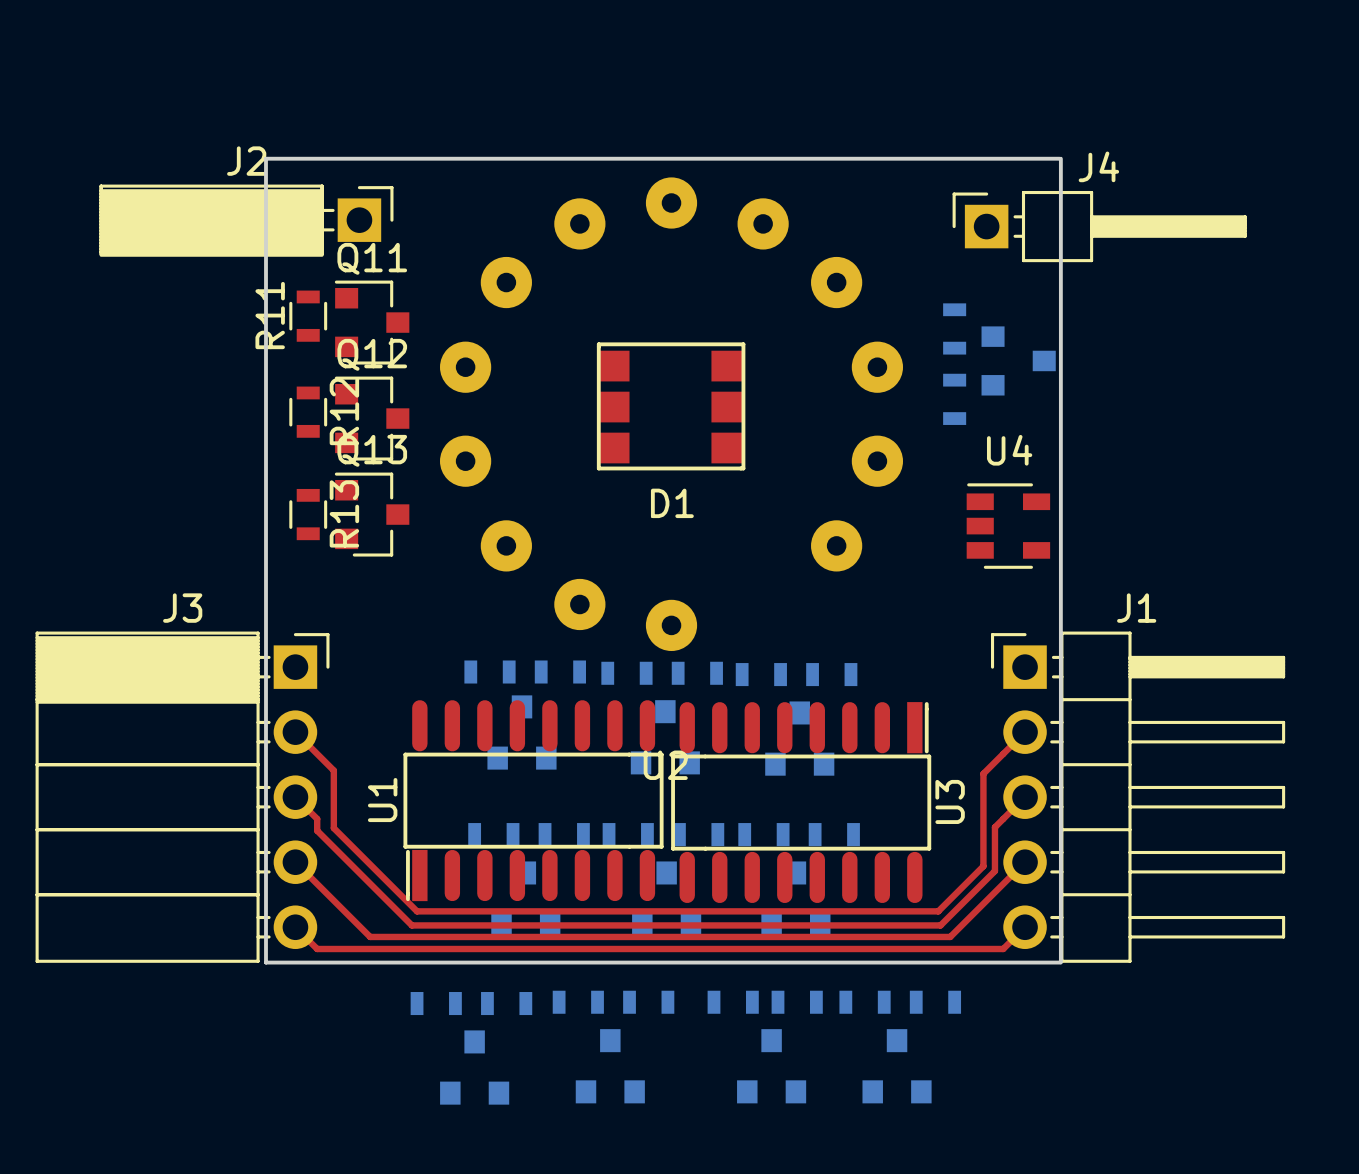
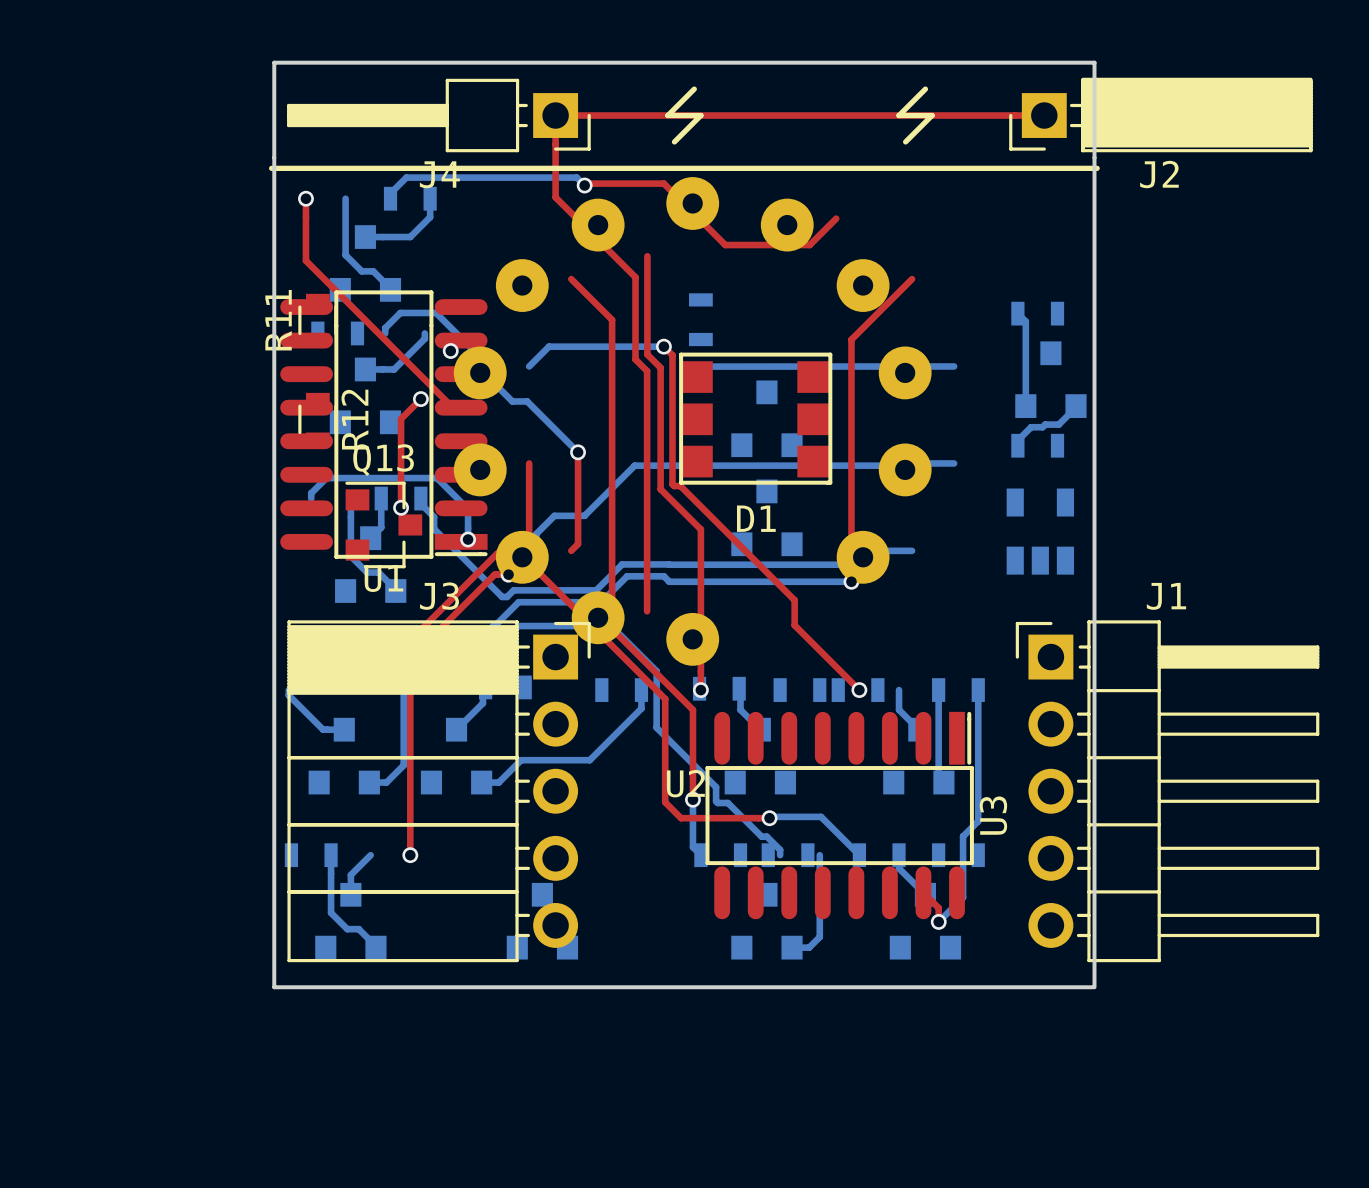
line: none -> (694, 89) (667, 115) (700, 115) (674, 141)
line: none -> (925, 89) (899, 115) (932, 115) (905, 141)
top track: none -> (1044, 115) (555, 115) (555, 197) (635, 277) (635, 359) (647, 371) (647, 611)
board edge: (265, 158) (1059, 158) -> (274, 157) (274, 62) (1094, 62) (1094, 157)
line: none -> (271, 168) (1097, 168)
top track: none -> (584, 185) (586, 183) (663, 183) (725, 245) (809, 245) (836, 218)
bottom track: none -> (584, 185) (576, 177) (406, 177) (390, 193) (390, 198)
via: none -> (584, 185)
top track: none -> (305, 198) (305, 260) (452, 407) (461, 407)
via: none -> (305, 198)
bottom track: none -> (345, 198) (345, 255) (361, 271) (373, 271) (390, 289)
part: none -> (410, 198)
bottom track: none -> (430, 198) (430, 217) (410, 237) (365, 237)
J2 rotation: 0° (246, 220) -> 180° (1160, 114)
J2 position: (246, 220) -> (1160, 114)
J4 rotation: 0° (1099, 226) -> 180° (438, 115)
J4 position: (1099, 226) -> (438, 115)
top track: none -> (647, 256) (647, 354) (660, 367) (660, 489) (700, 529) (700, 690)
part: none -> (365, 263)
top track: none -> (571, 279) (612, 319) (612, 629) (692, 709) (692, 799)
top track: none -> (912, 279) (851, 339) (851, 581)
bottom track: none -> (1017, 313) (1025, 321) (1025, 406)
part: none -> (1037, 313)
Q11 side: top (372, 322) -> bottom (766, 517)
part: none -> (337, 333)
bottom track: none -> (385, 333) (385, 328) (400, 312) (436, 312) (494, 371) (494, 383) (512, 401) (527, 401) (578, 452)
bottom track: none -> (424, 333) (424, 338) (394, 369) (365, 369)
part: (954, 328) -> none
top track: none -> (663, 346) (672, 355) (672, 484) (680, 486) (794, 600) (794, 625) (859, 690)
bottom track: none -> (663, 346) (549, 346) (529, 366)
via: none -> (663, 346)
via: none -> (450, 351)
part rotation: 0° (1018, 360) -> 90° counterclockwise (1050, 379)
bottom track: none -> (702, 366) (954, 366)
part: none -> (365, 395)
top track: none -> (420, 399) (401, 418) (401, 507)
via: none -> (420, 399)
part: (954, 399) -> none
bottom track: none -> (1076, 406) (1058, 424) (1031, 427) (1017, 440) (1017, 445)
D1 position: (671, 406) -> (755, 418)
Q12 side: top (372, 418) -> bottom (766, 418)
part: none -> (1037, 445)
top track: none -> (578, 452) (578, 544) (571, 550)
via: none -> (578, 452)
top track: none -> (529, 463) (529, 562) (665, 698) (665, 802) (681, 818) (769, 818)
bottom track: none -> (954, 463) (916, 463) (914, 465) (634, 465) (584, 515) (554, 515) (536, 534) (536, 558) (519, 574) (508, 574)
bottom track: none -> (311, 498) (311, 493) (326, 478) (436, 478) (468, 509) (468, 539)
bottom track: none -> (350, 498) (350, 556) (367, 572) (378, 572) (395, 591)
bottom track: none -> (381, 498) (381, 527) (370, 538)
part: none -> (401, 498)
bottom track: none -> (420, 498) (420, 503) (434, 517) (434, 528) (502, 596) (507, 596) (513, 590) (596, 590) (622, 564) (668, 564)
via: none -> (401, 507)
R13 side: top (308, 514) -> bottom (700, 319)
U4 side: top (1008, 526) -> bottom (1040, 531)
via: none -> (468, 539)
bottom track: none -> (912, 550) (874, 550) (860, 564) (669, 564)
top track: none -> (508, 553) (497, 553) (410, 640) (410, 855)
part: none -> (370, 564)
top track: none -> (508, 574) (494, 574) (432, 636) (432, 663)
via: none -> (508, 574)
bottom track: none -> (851, 581) (669, 581) (663, 576) (627, 576) (601, 602) (518, 602) (456, 663) (456, 671) (443, 684) (443, 690)
via: none -> (851, 581)
bottom track: none -> (501, 642) (517, 626) (611, 626) (656, 671) (656, 727) (716, 787) (716, 801) (727, 803) (761, 836) (766, 836) (780, 849) (780, 855)
part: (560, 672) -> none
part: (626, 673) -> none
bottom track: none -> (288, 690) (288, 695) (323, 729) (344, 729)
bottom track: none -> (403, 690) (403, 765) (386, 782) (369, 782)
bottom track: none -> (482, 690) (482, 703) (456, 729)
part: none -> (621, 690)
bottom track: none -> (641, 690) (641, 708) (589, 760) (521, 760) (498, 782) (481, 782)
via: none -> (700, 690)
bottom track: none -> (740, 690) (740, 709) (760, 729)
part position: (761, 674) -> (799, 690)
via: none -> (859, 690)
bottom track: none -> (899, 690) (899, 709) (918, 729)
bottom track: none -> (938, 690) (938, 777) (943, 782)
part: none -> (958, 690)
bottom track: none -> (978, 690) (978, 821) (963, 836) (963, 897) (938, 921)
top track: (295, 732) (333, 770) (333, 828) (417, 911) (938, 911) (983, 866) (983, 773) (1025, 732) -> none
part position: (522, 732) -> (456, 756)
part: (665, 737) -> none
part: none -> (344, 756)
part: none -> (760, 756)
part: (799, 738) -> none
part: none -> (918, 756)
bottom track: none -> (692, 799) (692, 847) (700, 855)
via: none -> (692, 799)
J3 position: (182, 797) -> (439, 791)
top track: (295, 797) (317, 818) (317, 830) (411, 925) (940, 925) (994, 871) (994, 827) (1025, 797) -> none
J1 position: (1138, 797) -> (1167, 791)
bottom track: none -> (769, 818) (821, 816) (859, 855)
via: none -> (769, 818)
U1 rotation: 0° (533, 800) -> 90° counterclockwise (383, 424)
U1 position: (533, 800) -> (383, 424)
U3 position: (801, 802) -> (839, 815)
part: none -> (311, 855)
bottom track: none -> (331, 855) (331, 912) (347, 929) (358, 929) (375, 947)
bottom track: none -> (370, 855) (350, 874) (350, 894)
via: none -> (410, 855)
part: (493, 834) -> none
part: (564, 834) -> none
part: (628, 834) -> none
bottom track: none -> (819, 855) (819, 937) (809, 947) (792, 947)
part position: (834, 834) -> (879, 855)
bottom track: none -> (899, 855) (899, 868) (925, 894)
part: none -> (958, 855)
top track: (295, 862) (370, 936) (950, 936) (1025, 862) -> none
top track: none -> (923, 892) (938, 908) (938, 921)
part: none -> (350, 921)
part: (666, 898) -> none
part: none -> (766, 921)
part: (795, 898) -> none
part: none -> (925, 921)
via: none -> (938, 921)
top track: (295, 927) (317, 948) (1003, 948) (1025, 927) -> none
part: (578, 1002) -> none
part: (648, 1002) -> none
part: (733, 1002) -> none
part: (797, 1002) -> none
part: (865, 1002) -> none
part: (935, 1002) -> none
part: (436, 1003) -> none
part: (506, 1003) -> none
part: (610, 1066) -> none
part: (771, 1066) -> none
part: (897, 1066) -> none
part: (474, 1067) -> none

